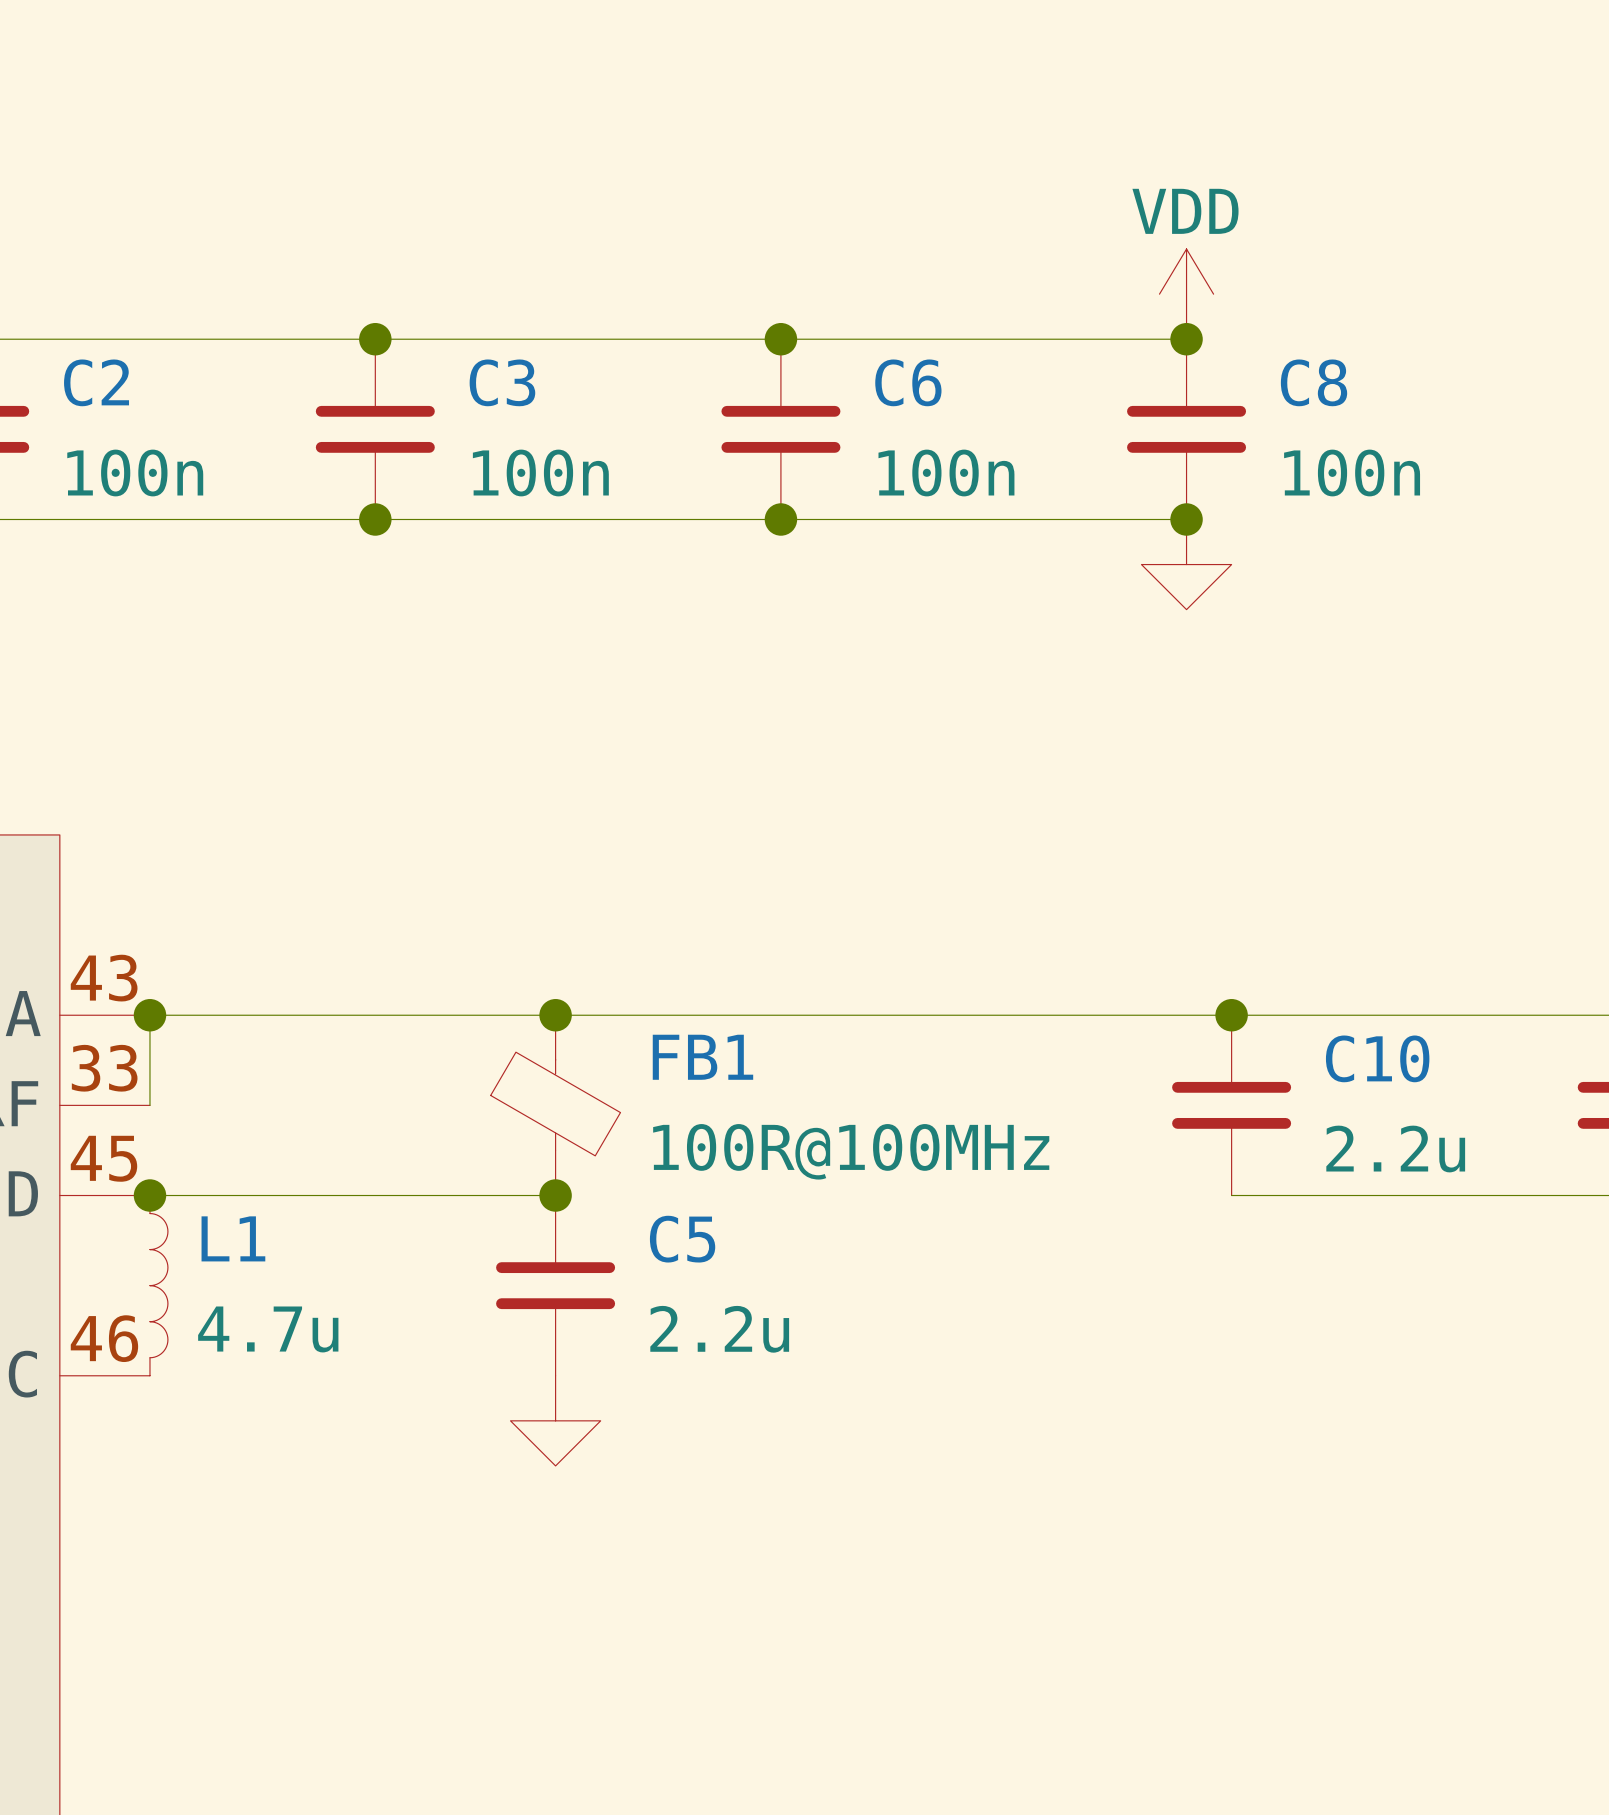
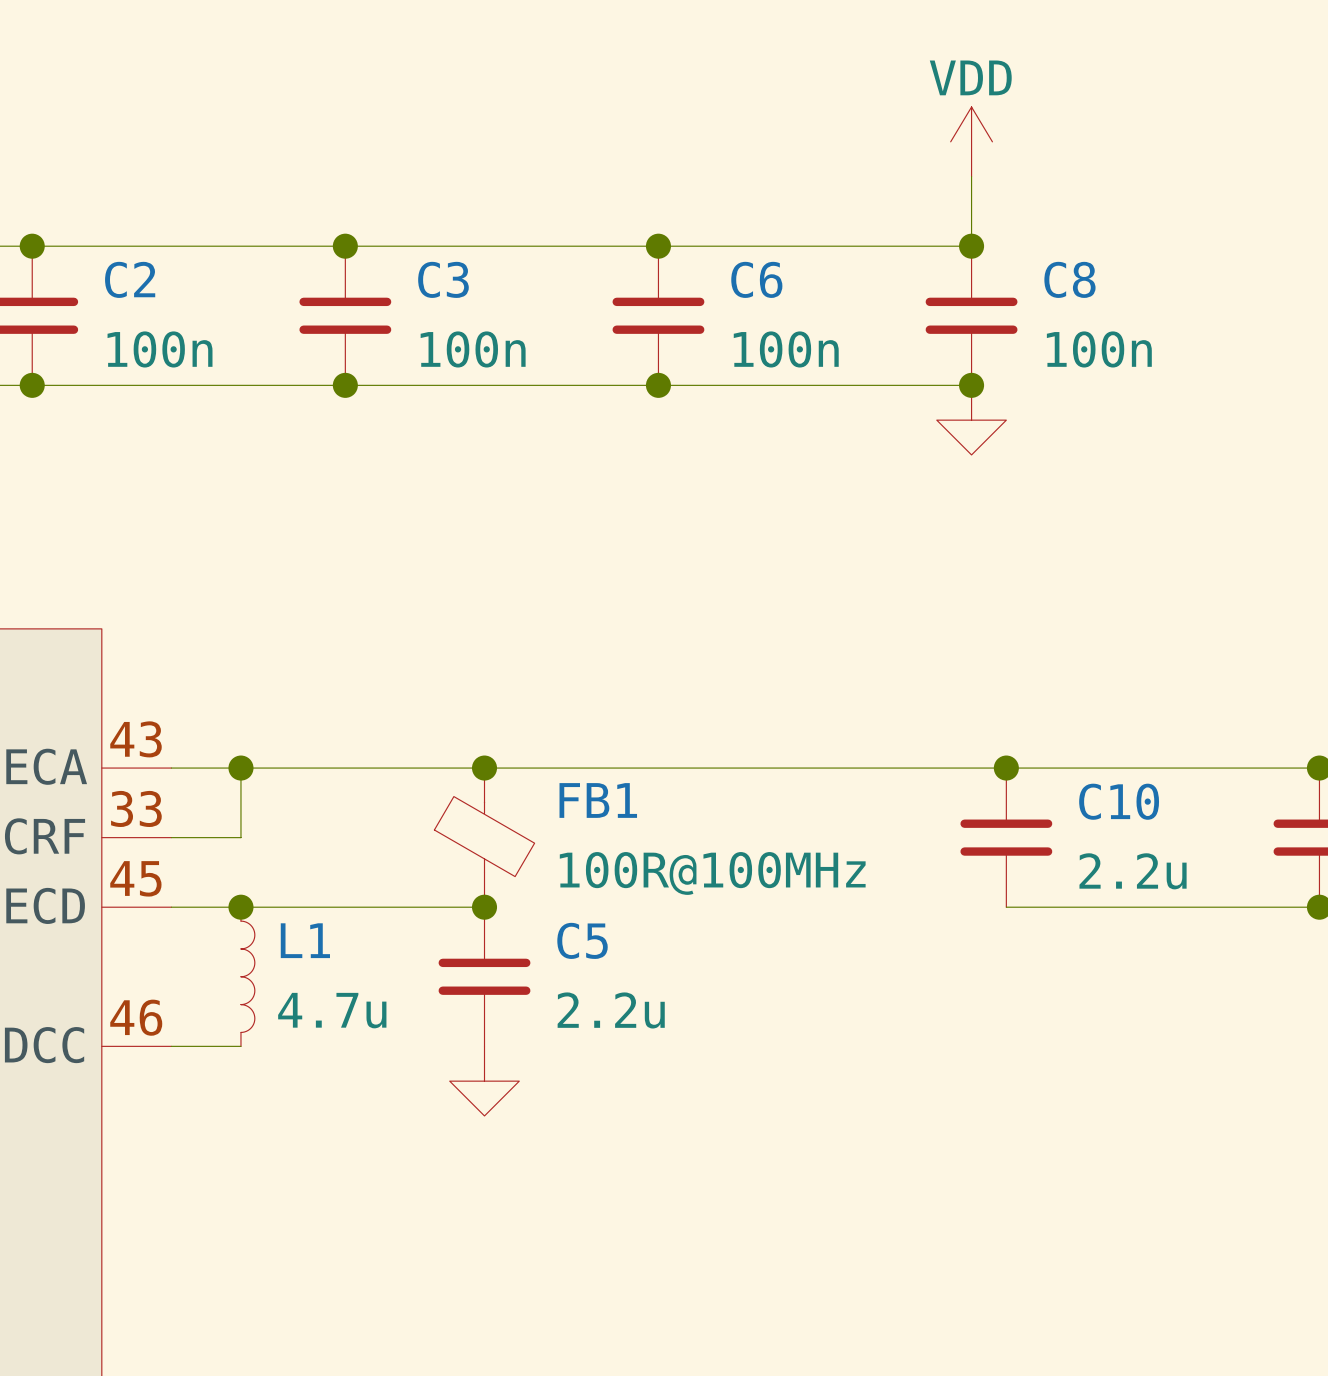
power symbol position: VDD (1186, 294) -> VDD (971, 141)
wire: (149, 1015) (149, 1105) -> (240, 768) (240, 837) (171, 837)
junction position: (149, 1015) -> (240, 768)
junction position: (149, 1195) -> (240, 907)
L1 position: (158, 1285) -> (247, 976)
wire: none -> (171, 1046) (240, 1046)

